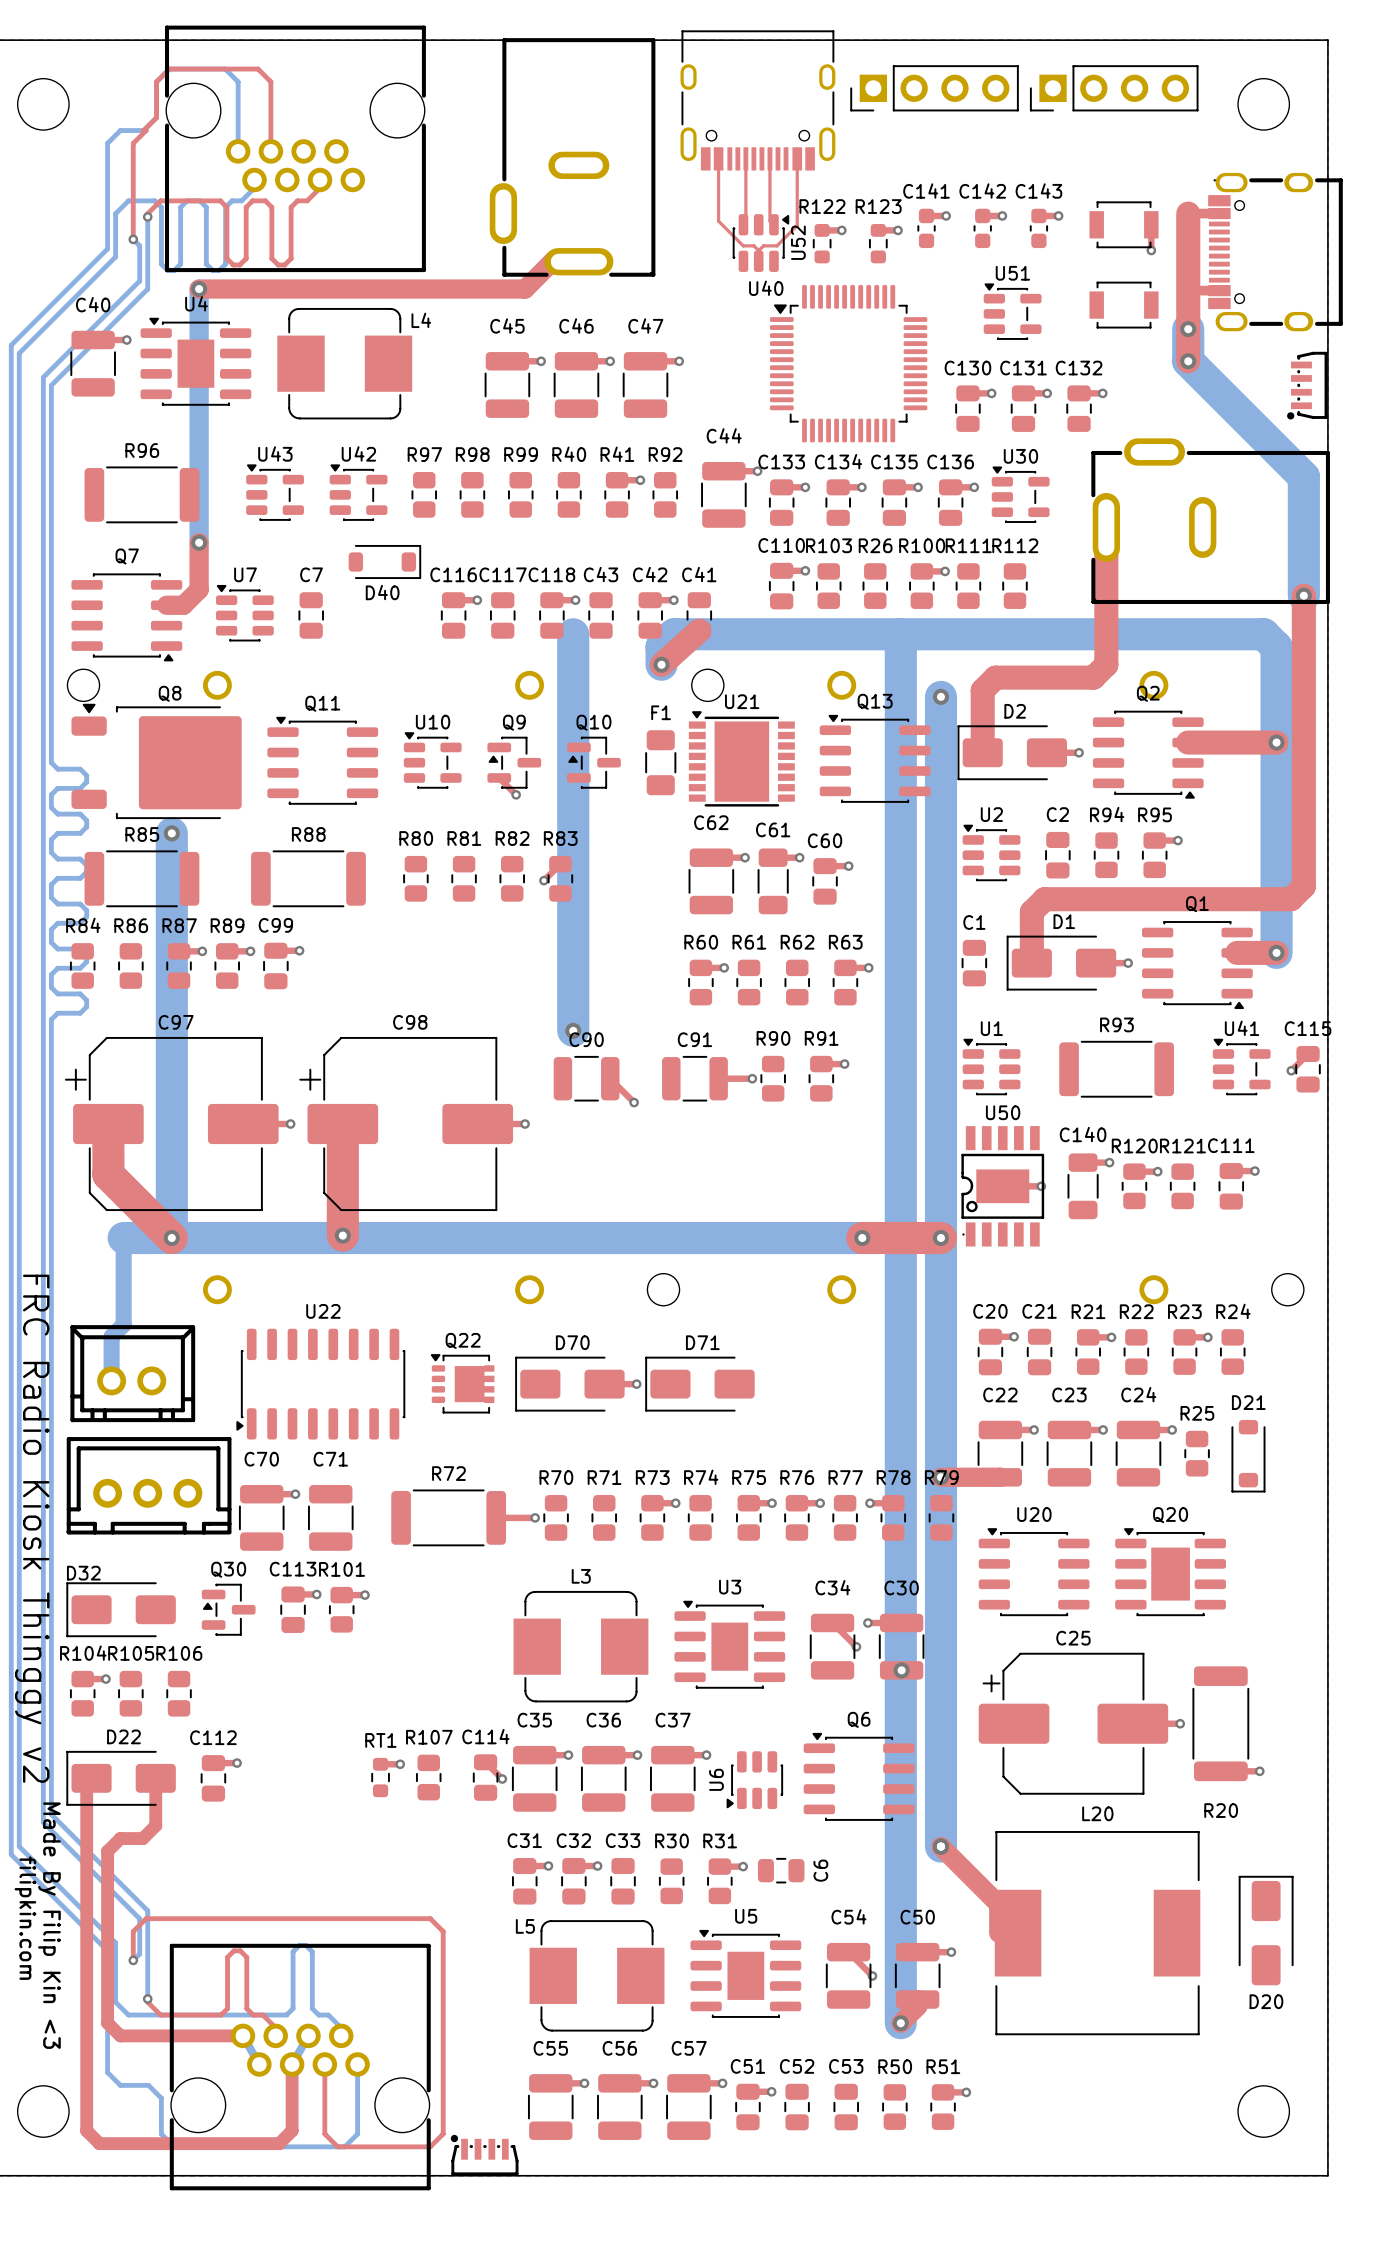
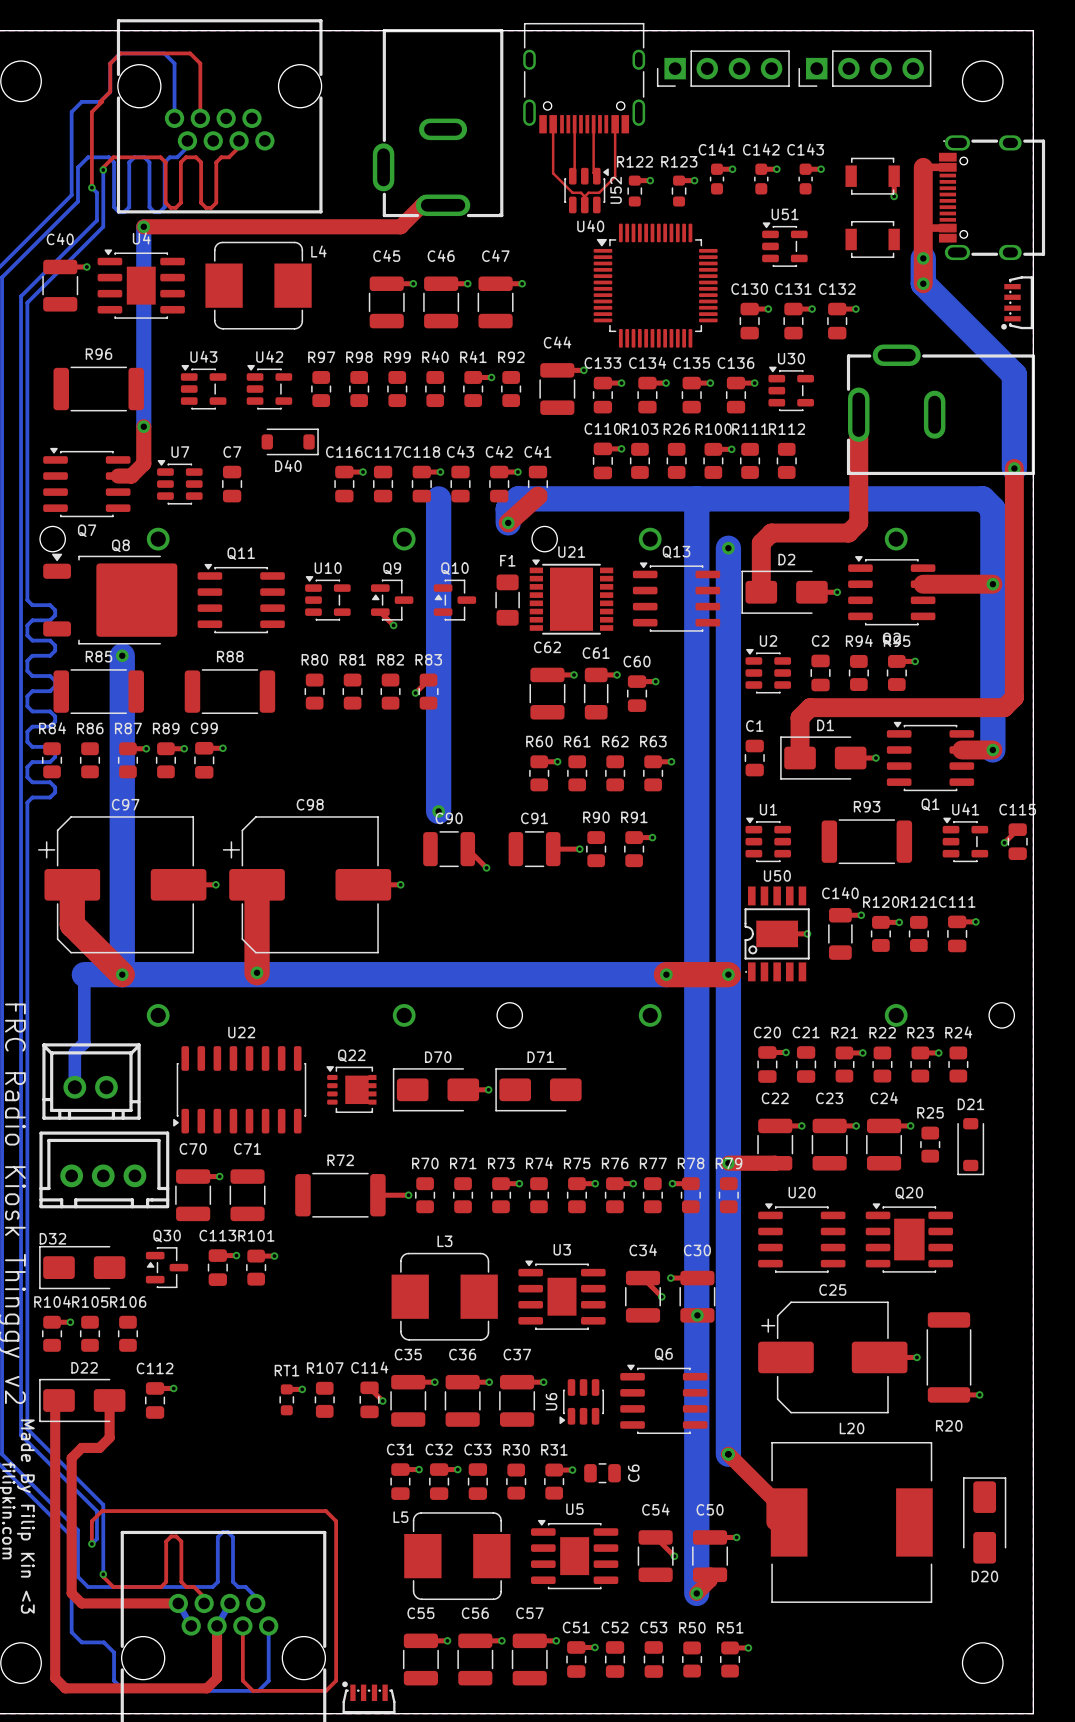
Q7 rotation: 0° (126, 617) -> 180° (86, 482)
Q2 rotation: 0° (1148, 754) -> 180° (891, 590)
Q1 rotation: 0° (1197, 965) -> 180° (930, 756)

